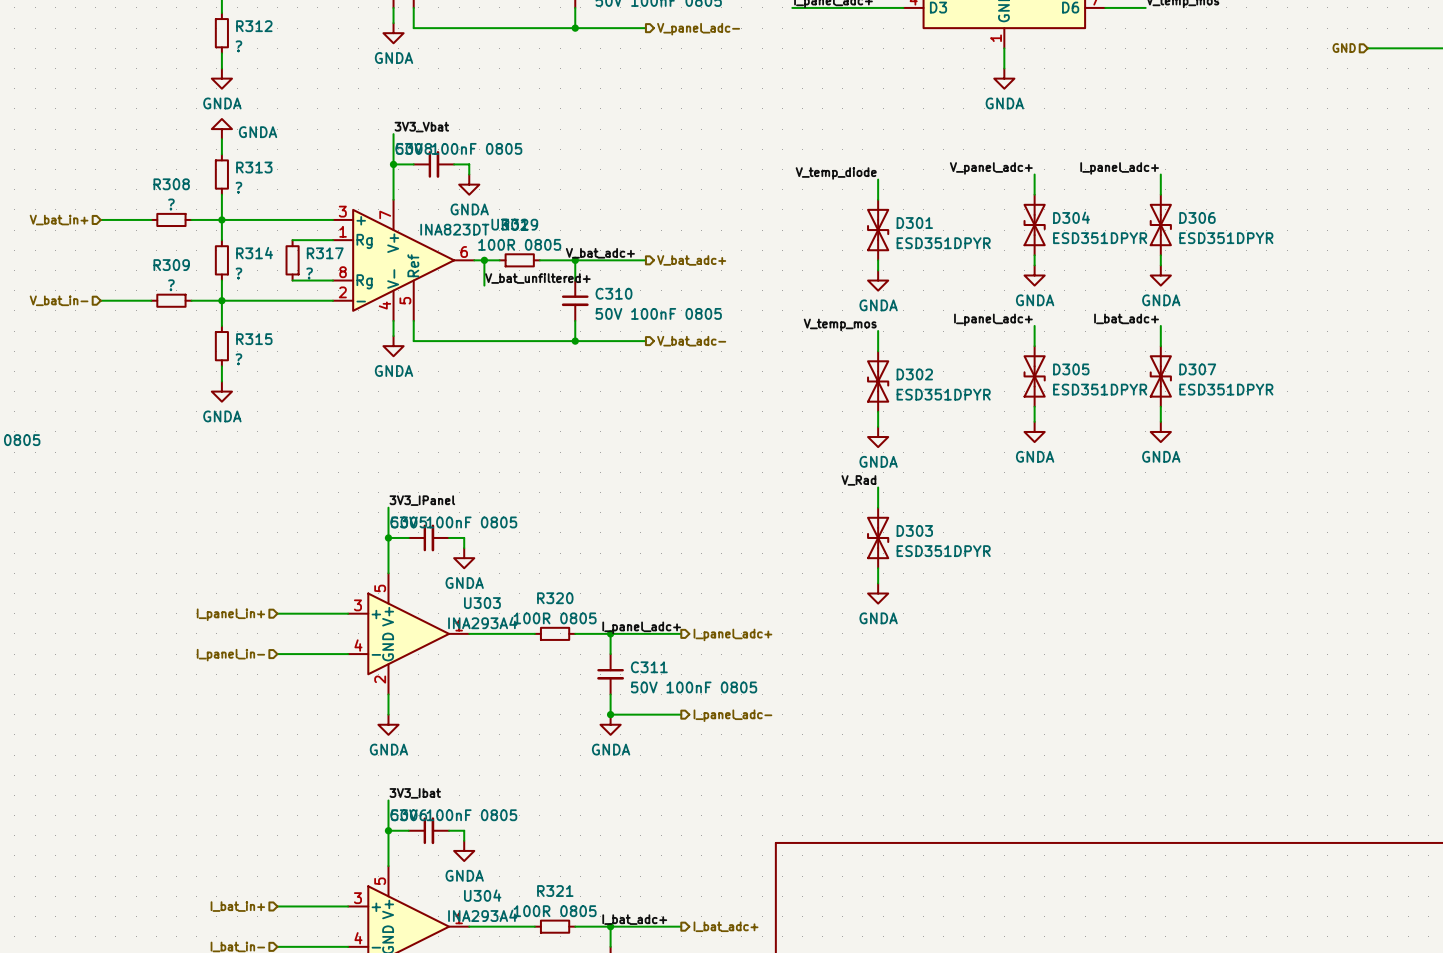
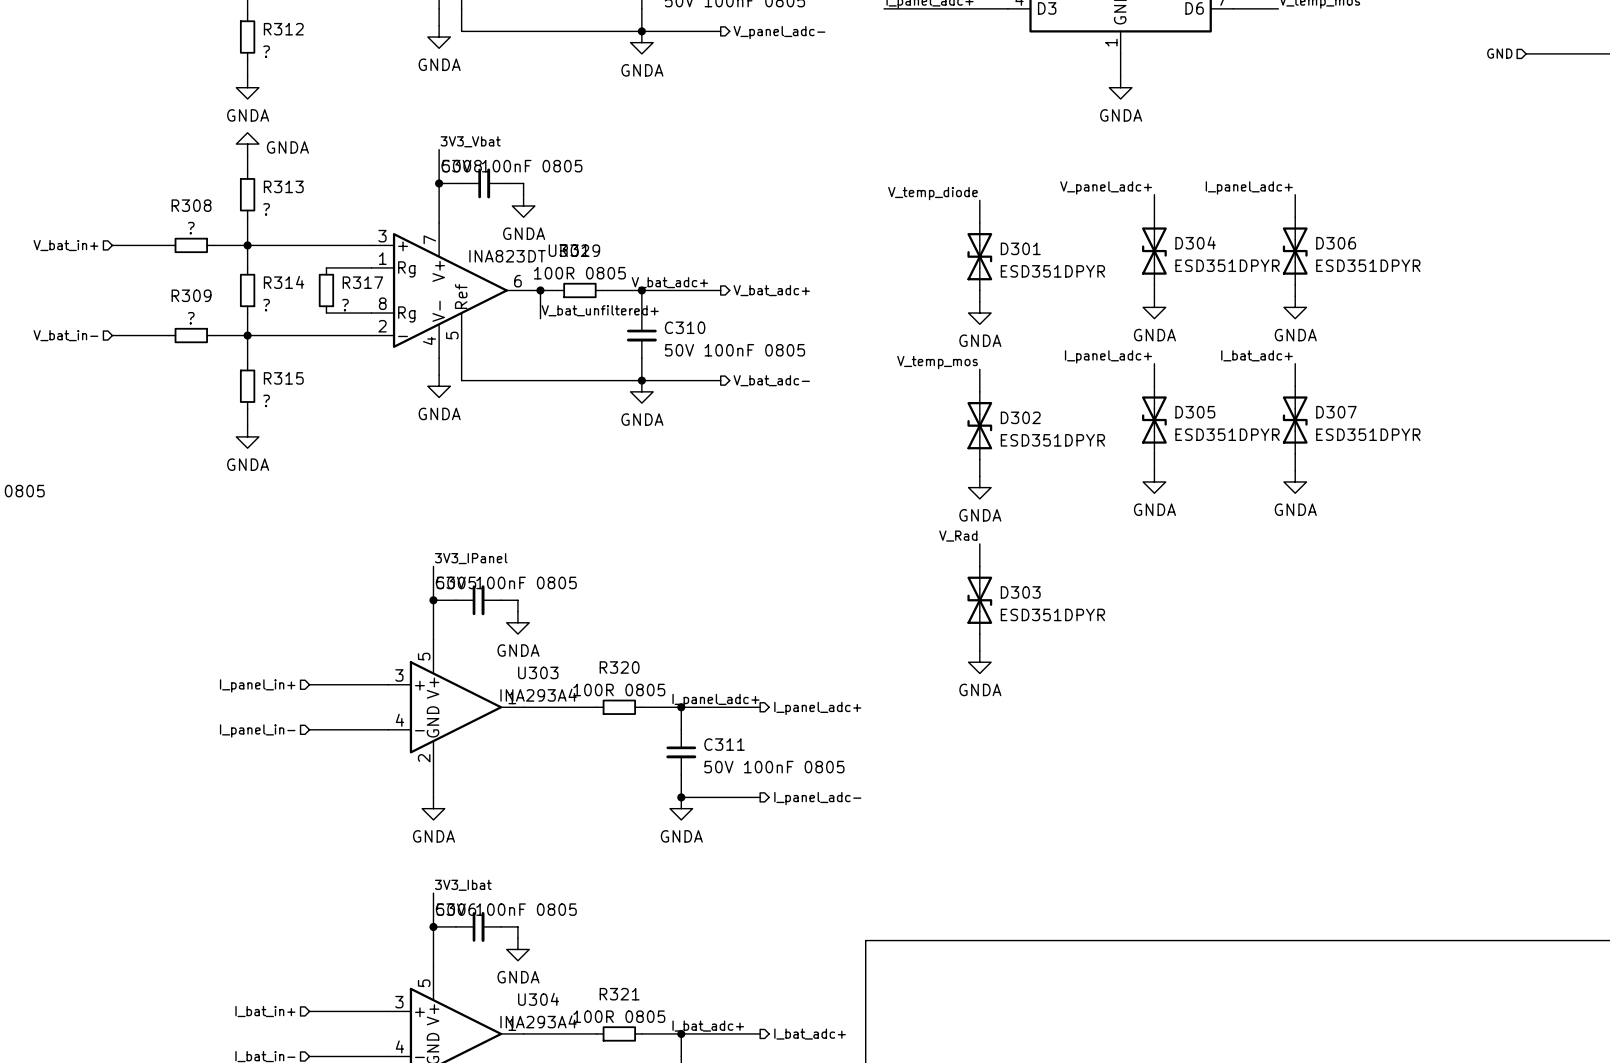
power symbol: none -> GNDA (641, 42)
power symbol: none -> GNDA (641, 391)

